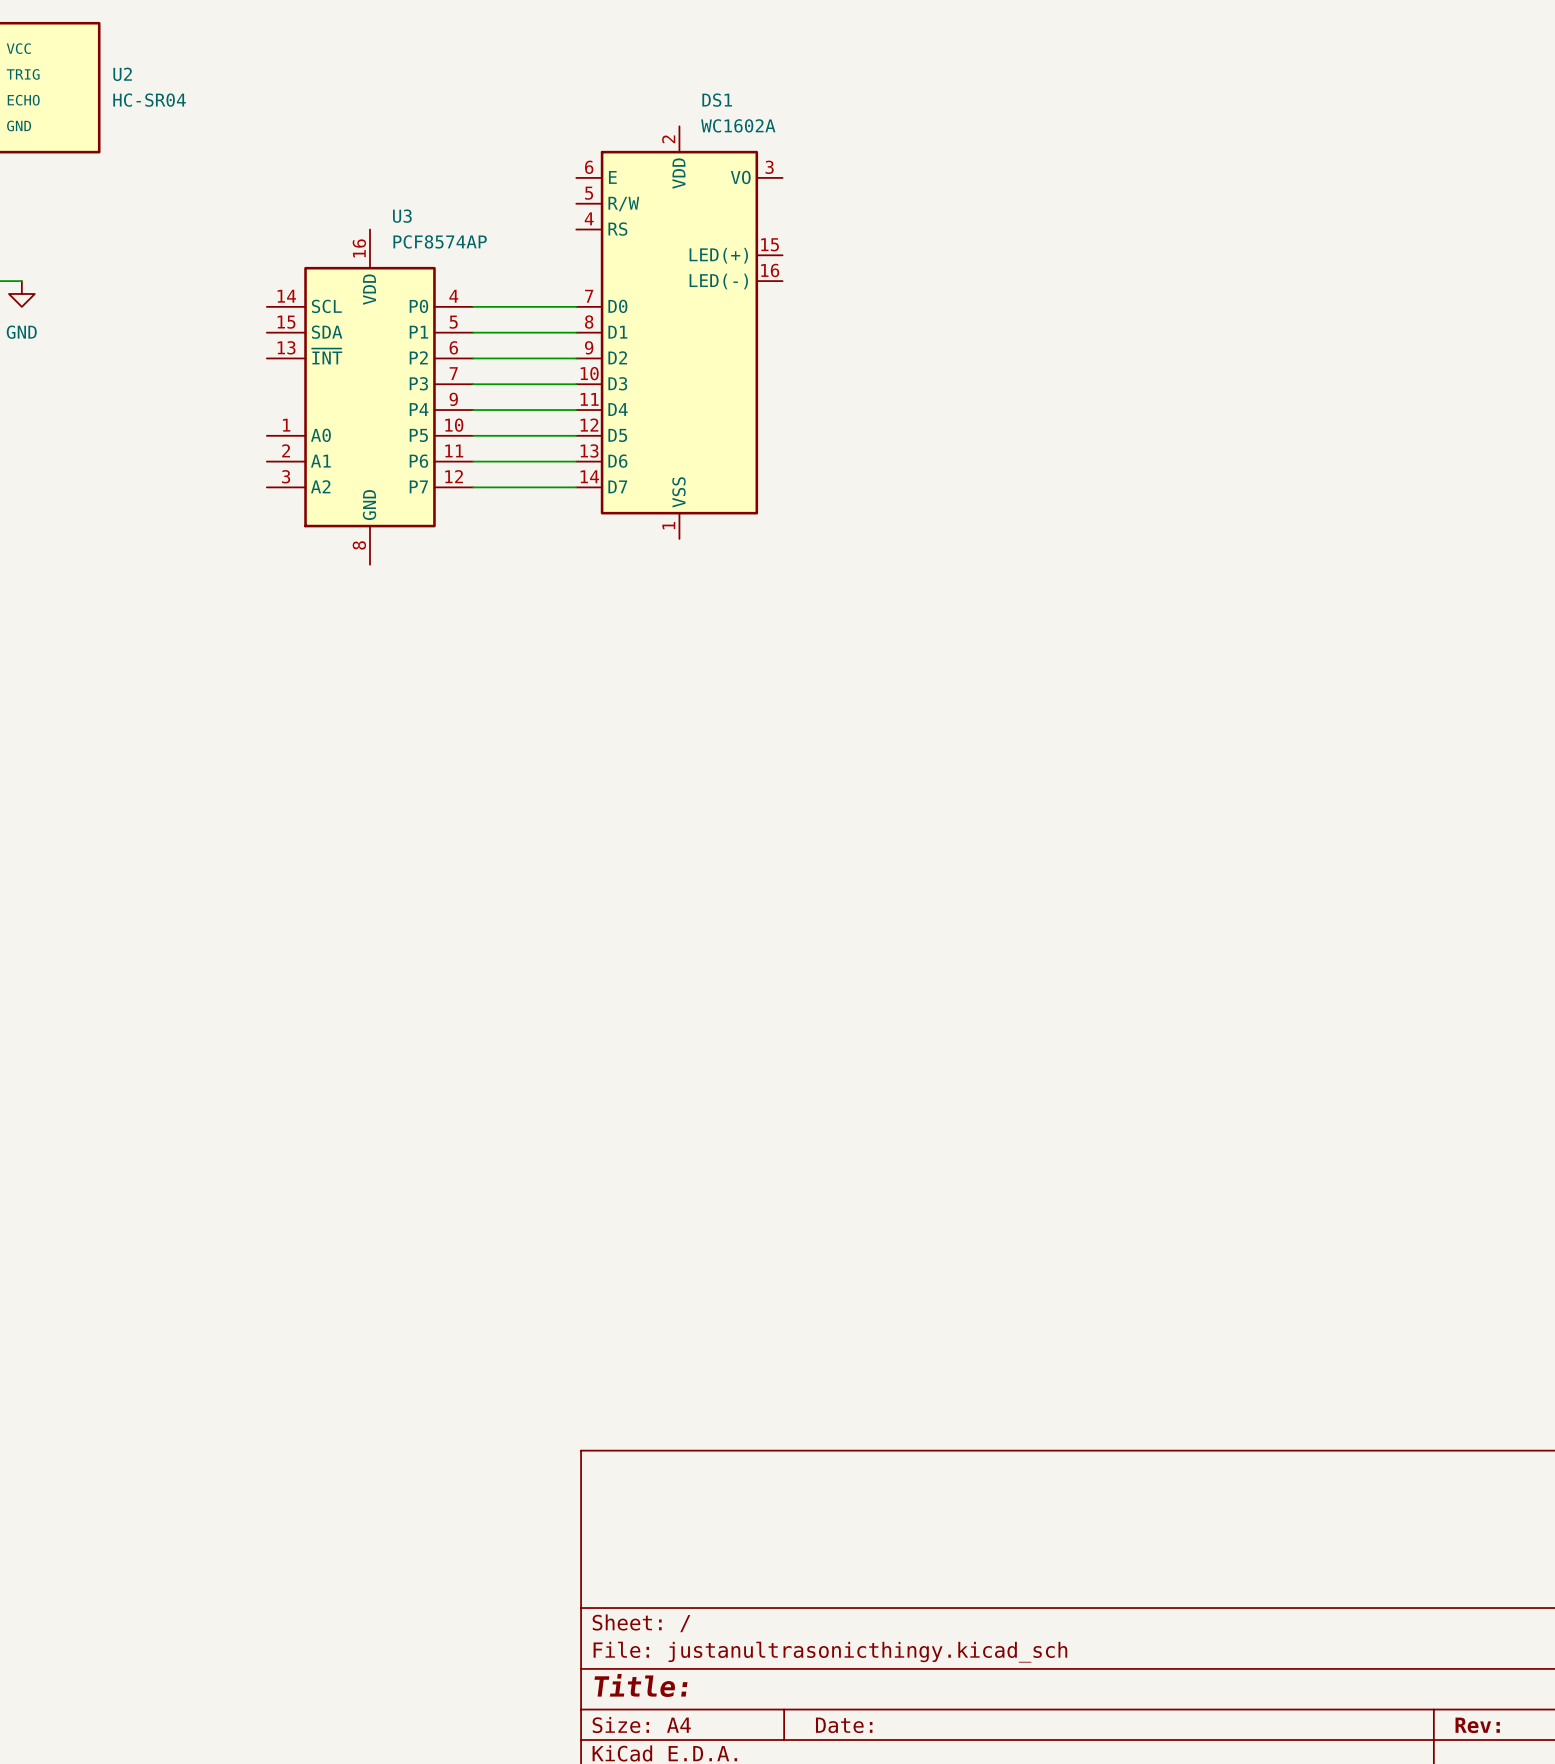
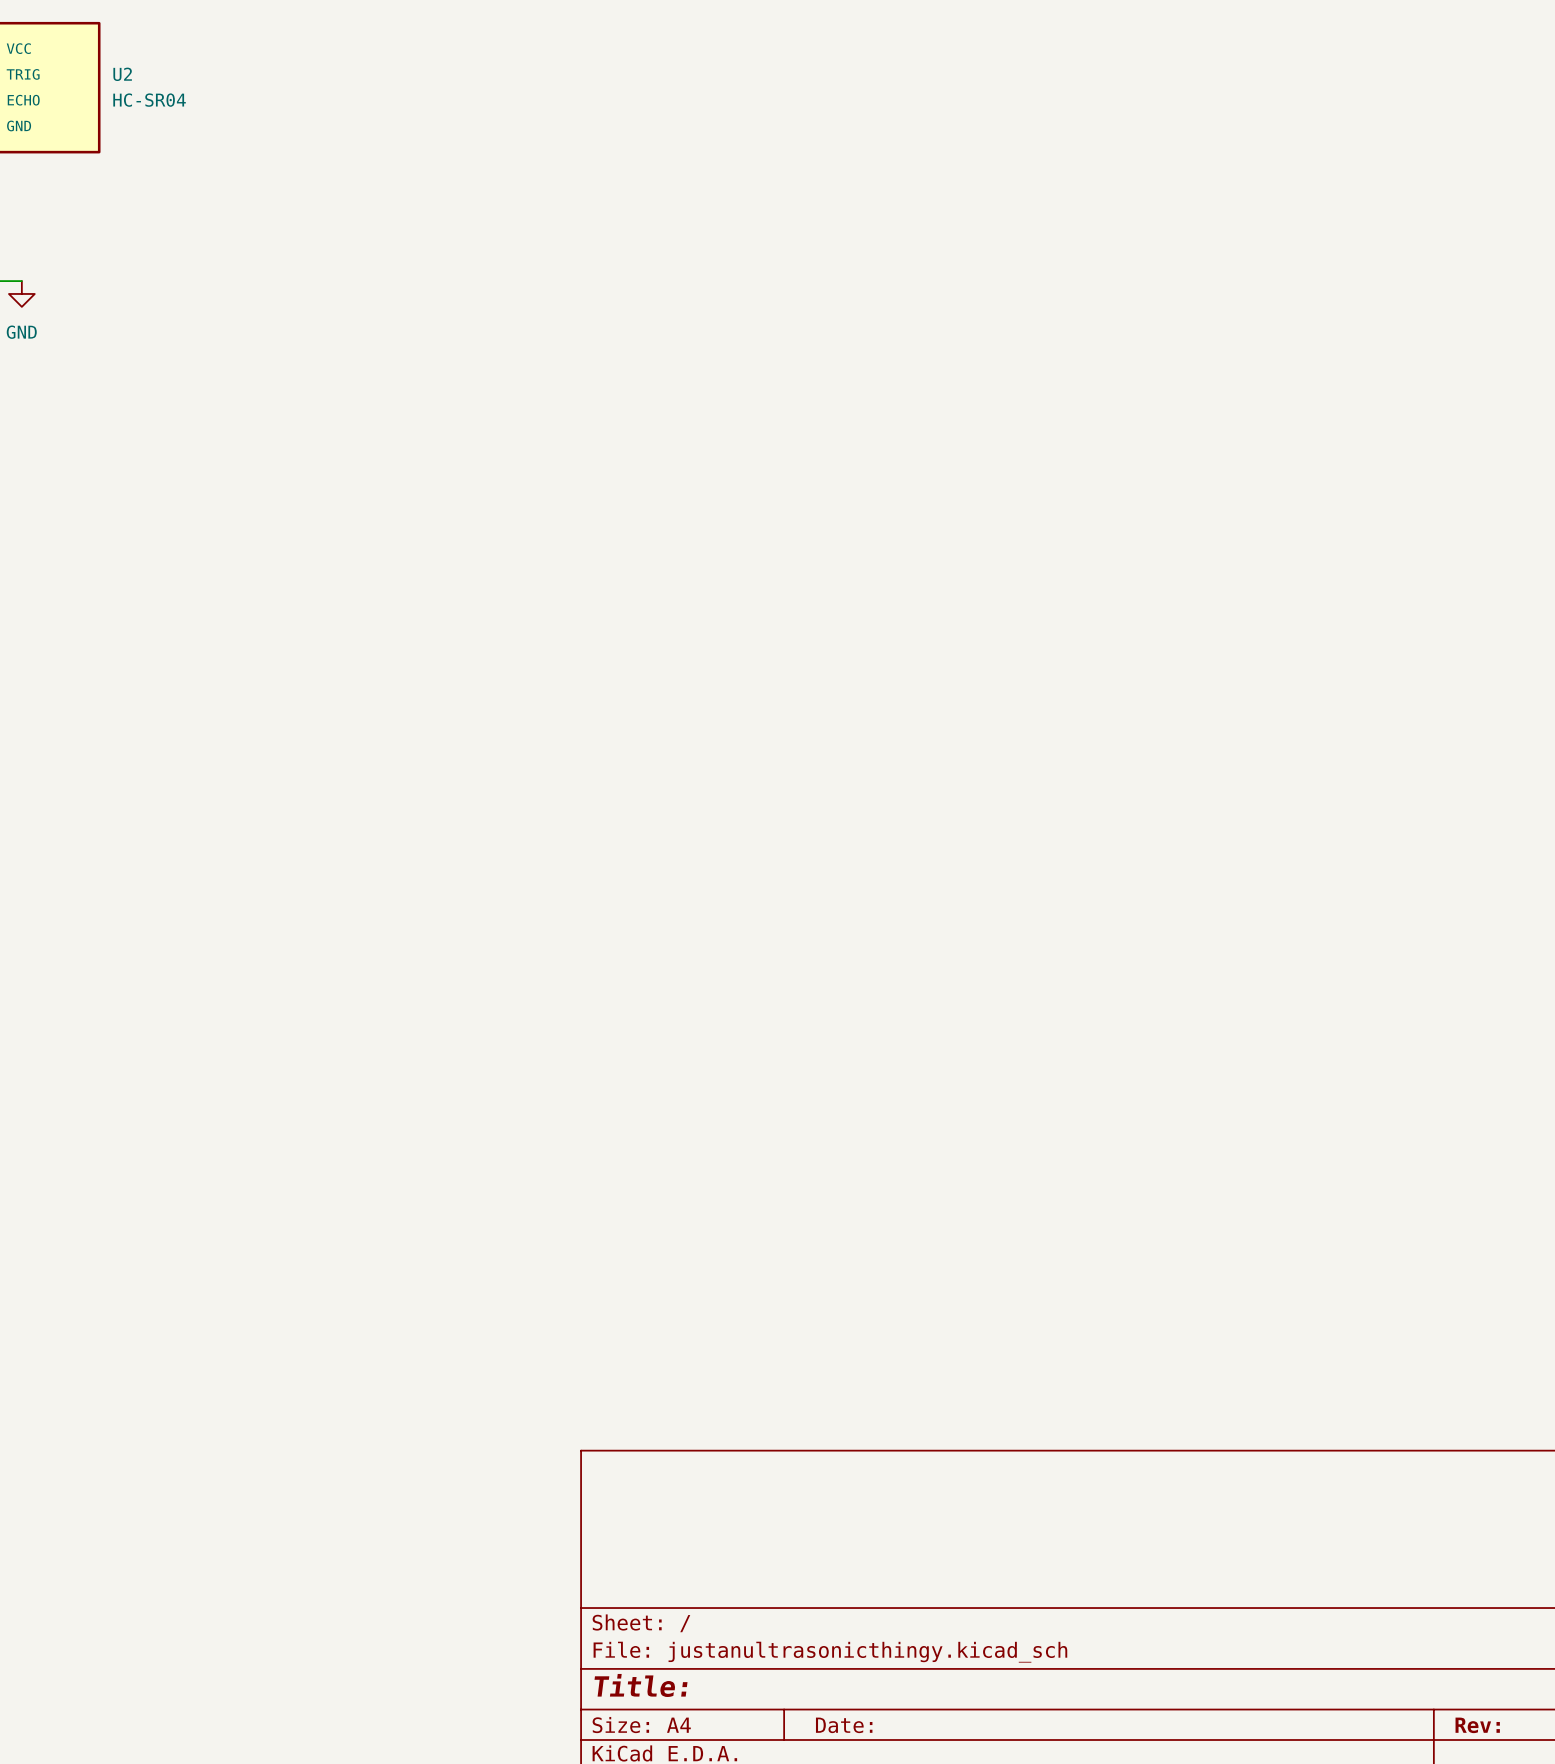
wire: (473, 306) (576, 306) -> none
wire: (473, 332) (576, 332) -> none
DS1: WC1602A (679, 332) -> none
wire: (473, 358) (576, 358) -> none
wire: (473, 384) (576, 384) -> none
U3: PCF8574AP (369, 397) -> none
wire: (473, 410) (576, 410) -> none
wire: (473, 435) (576, 435) -> none
wire: (473, 461) (576, 461) -> none
wire: (473, 487) (576, 487) -> none

